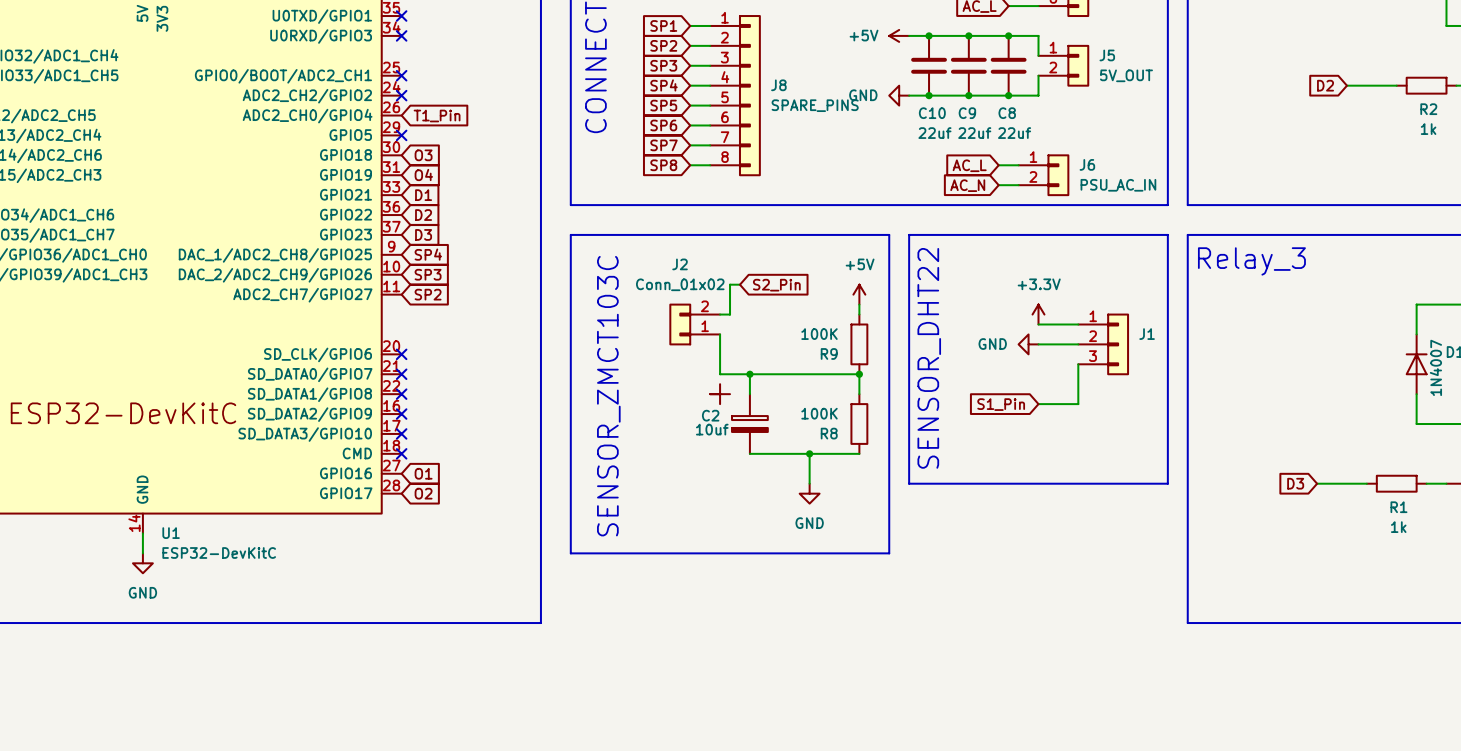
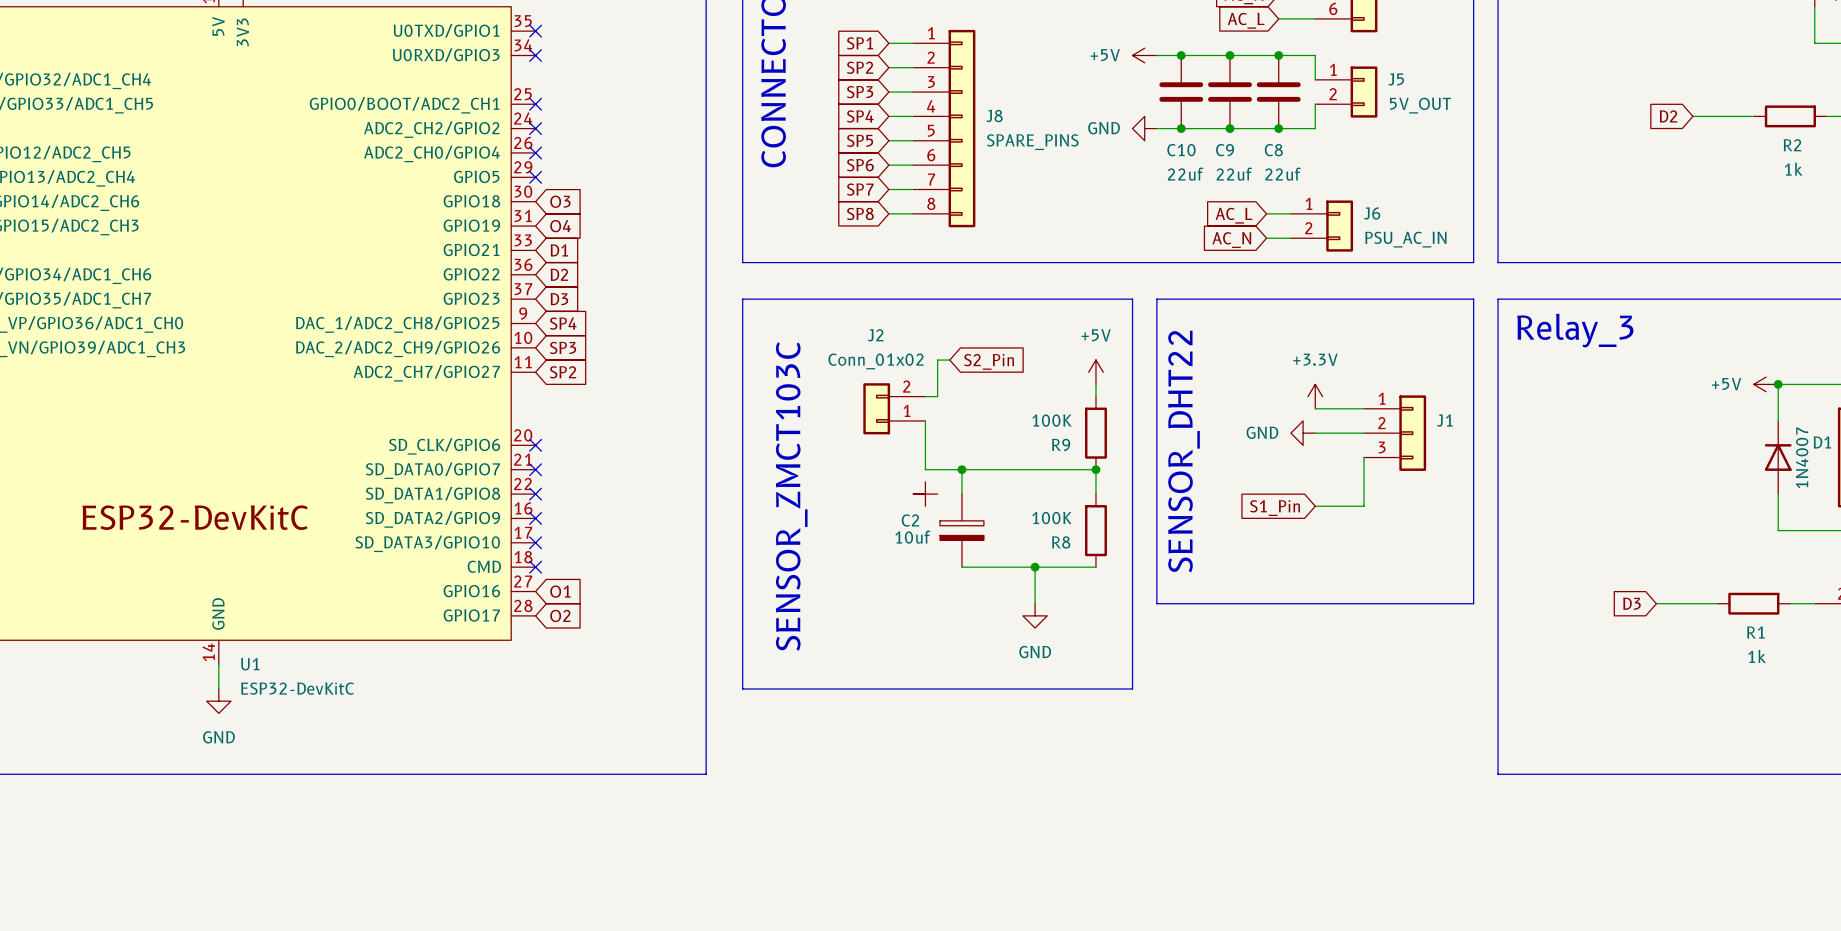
no-connect mark: none -> (535, 152)
global label: T1_Pin (437, 116) -> none
power symbol: none -> +5V (1766, 384)
junction: none -> (1778, 384)

